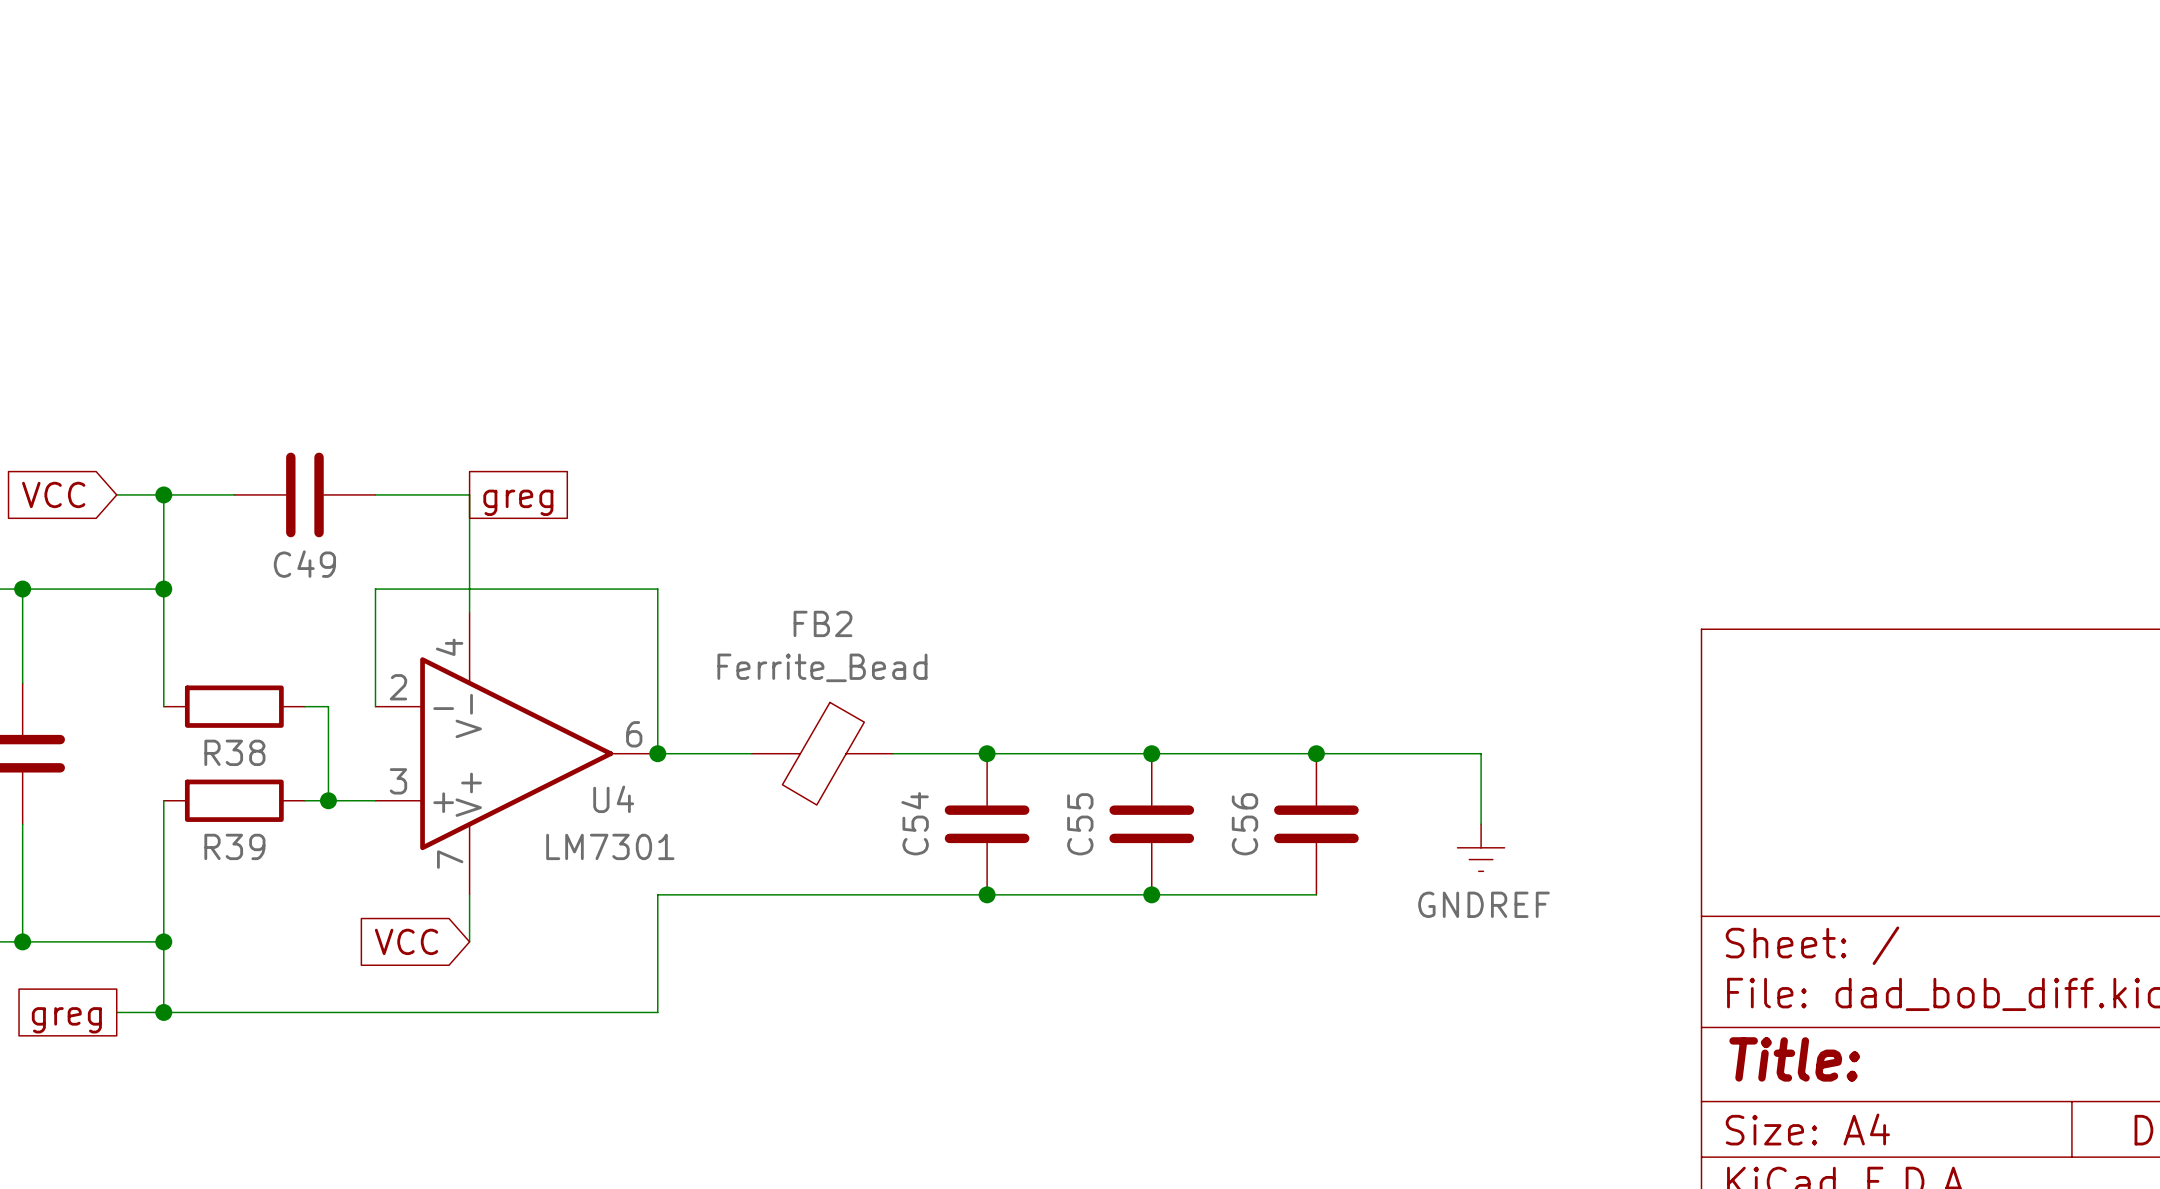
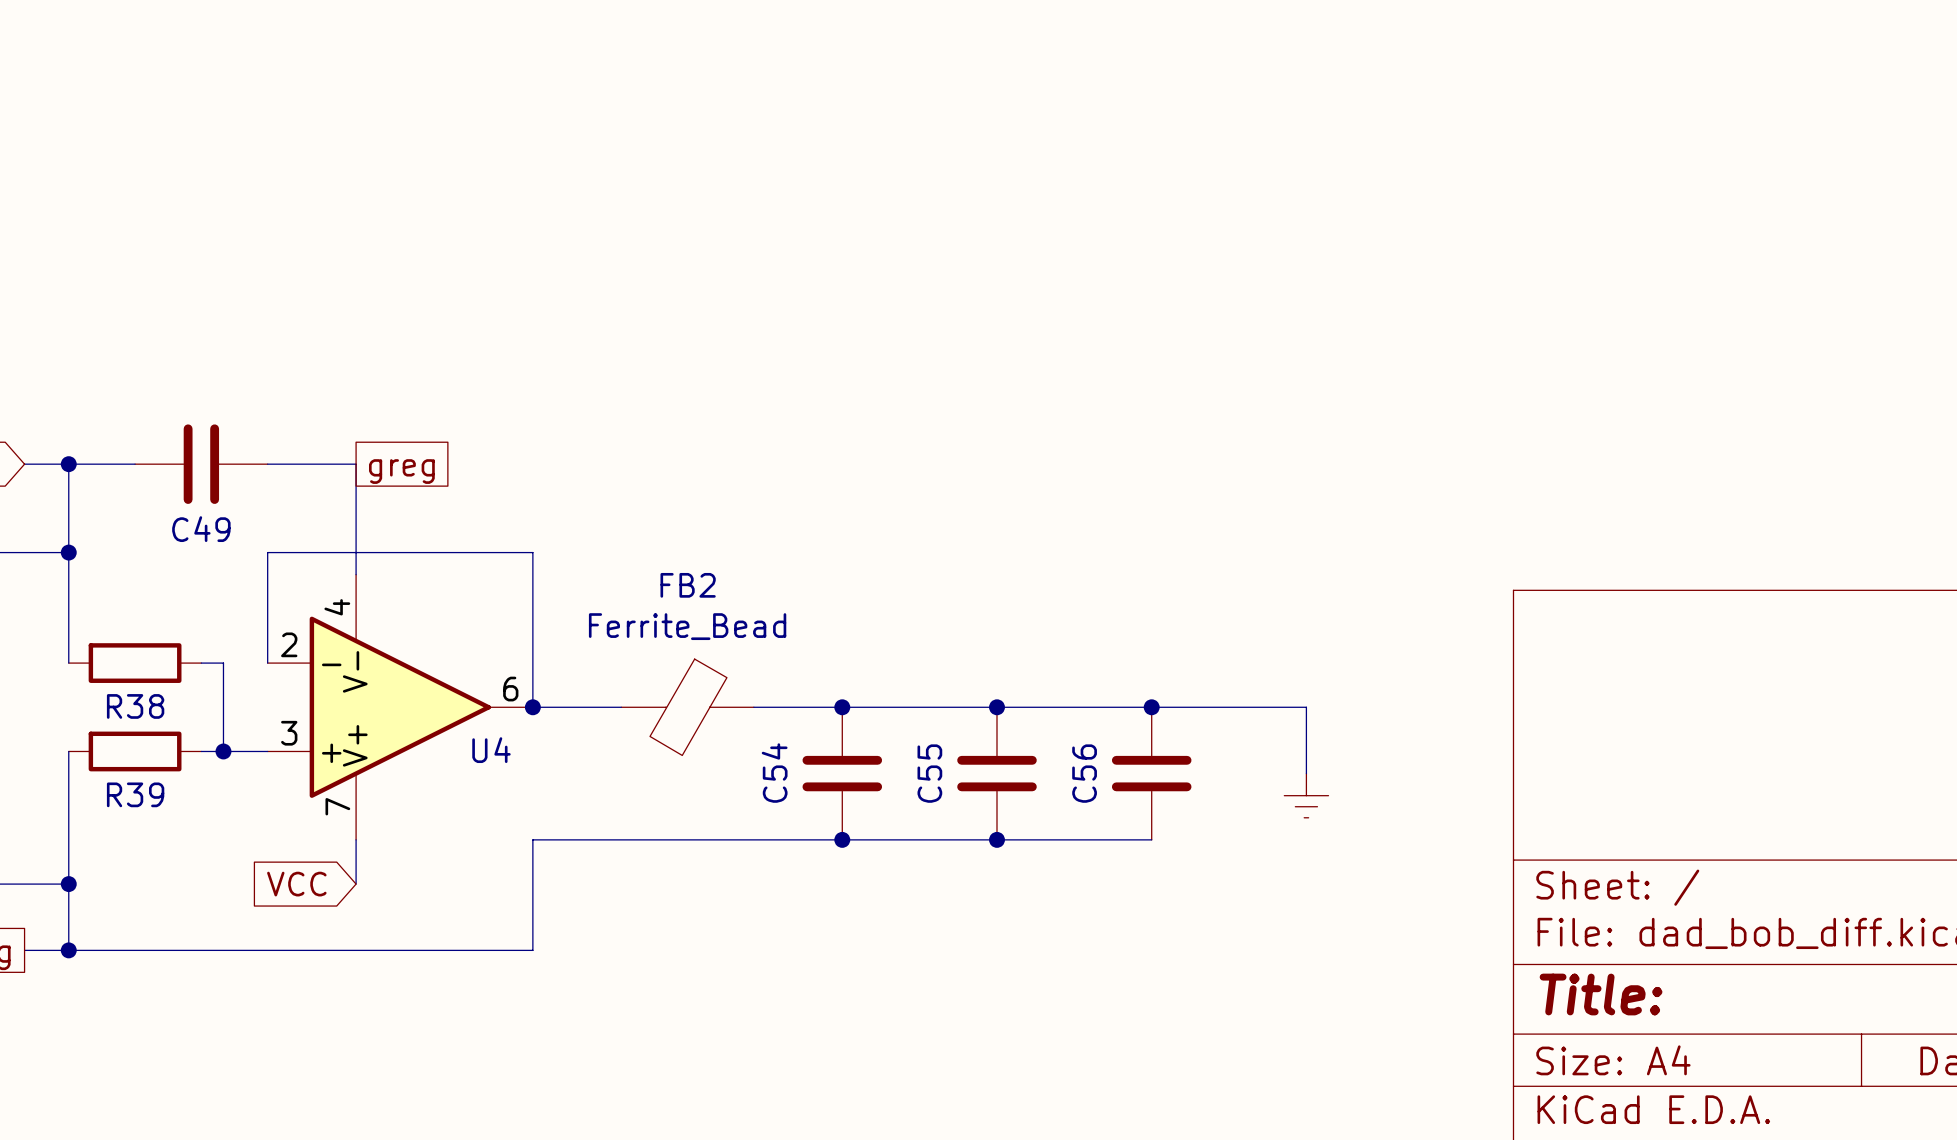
U4 value: LM7301 (610, 846) -> none
power symbol text: GNDREF (1484, 904) -> none

